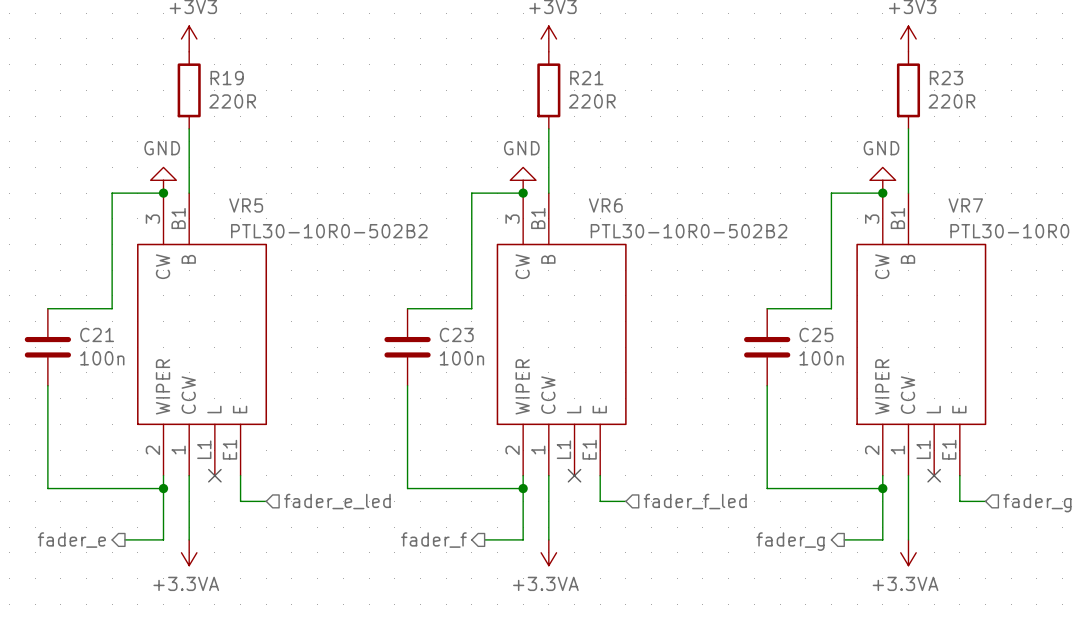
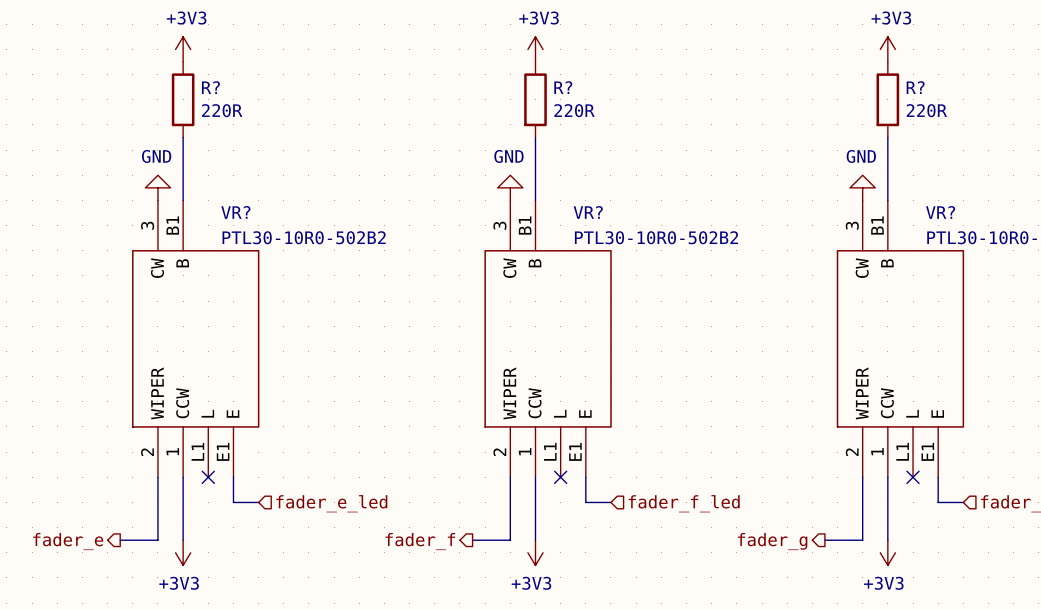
R19 name: R19 (227, 78) -> R? (210, 87)
R21 name: R21 (586, 78) -> R? (563, 87)
R23 name: R23 (946, 78) -> R? (915, 87)
wire: (163, 193) (112, 193) (112, 308) (47, 308) -> none
junction: (163, 193) -> none
wire: (523, 193) (471, 193) (471, 308) (407, 308) -> none
junction: (523, 193) -> none
wire: (882, 193) (831, 193) (831, 308) (767, 308) -> none
junction: (882, 193) -> none
VR5 name: VR5 (246, 205) -> VR? (235, 212)
VR6 name: VR6 (605, 205) -> VR? (588, 212)
VR7 name: VR7 (965, 205) -> VR? (940, 212)
C21: 100n (47, 347) -> none
C23: 100n (407, 347) -> none
C25: 100n (767, 347) -> none
wire: (47, 385) (47, 488) (163, 488) -> none
wire: (407, 385) (407, 488) (523, 488) -> none
wire: (767, 385) (767, 488) (882, 488) -> none
junction: (163, 488) -> none
junction: (523, 488) -> none
junction: (882, 488) -> none
power symbol: +3.3VA (189, 552) -> +3V3 (183, 552)
power symbol: +3.3VA (548, 552) -> +3V3 (535, 552)
power symbol: +3.3VA (908, 552) -> +3V3 (887, 552)

